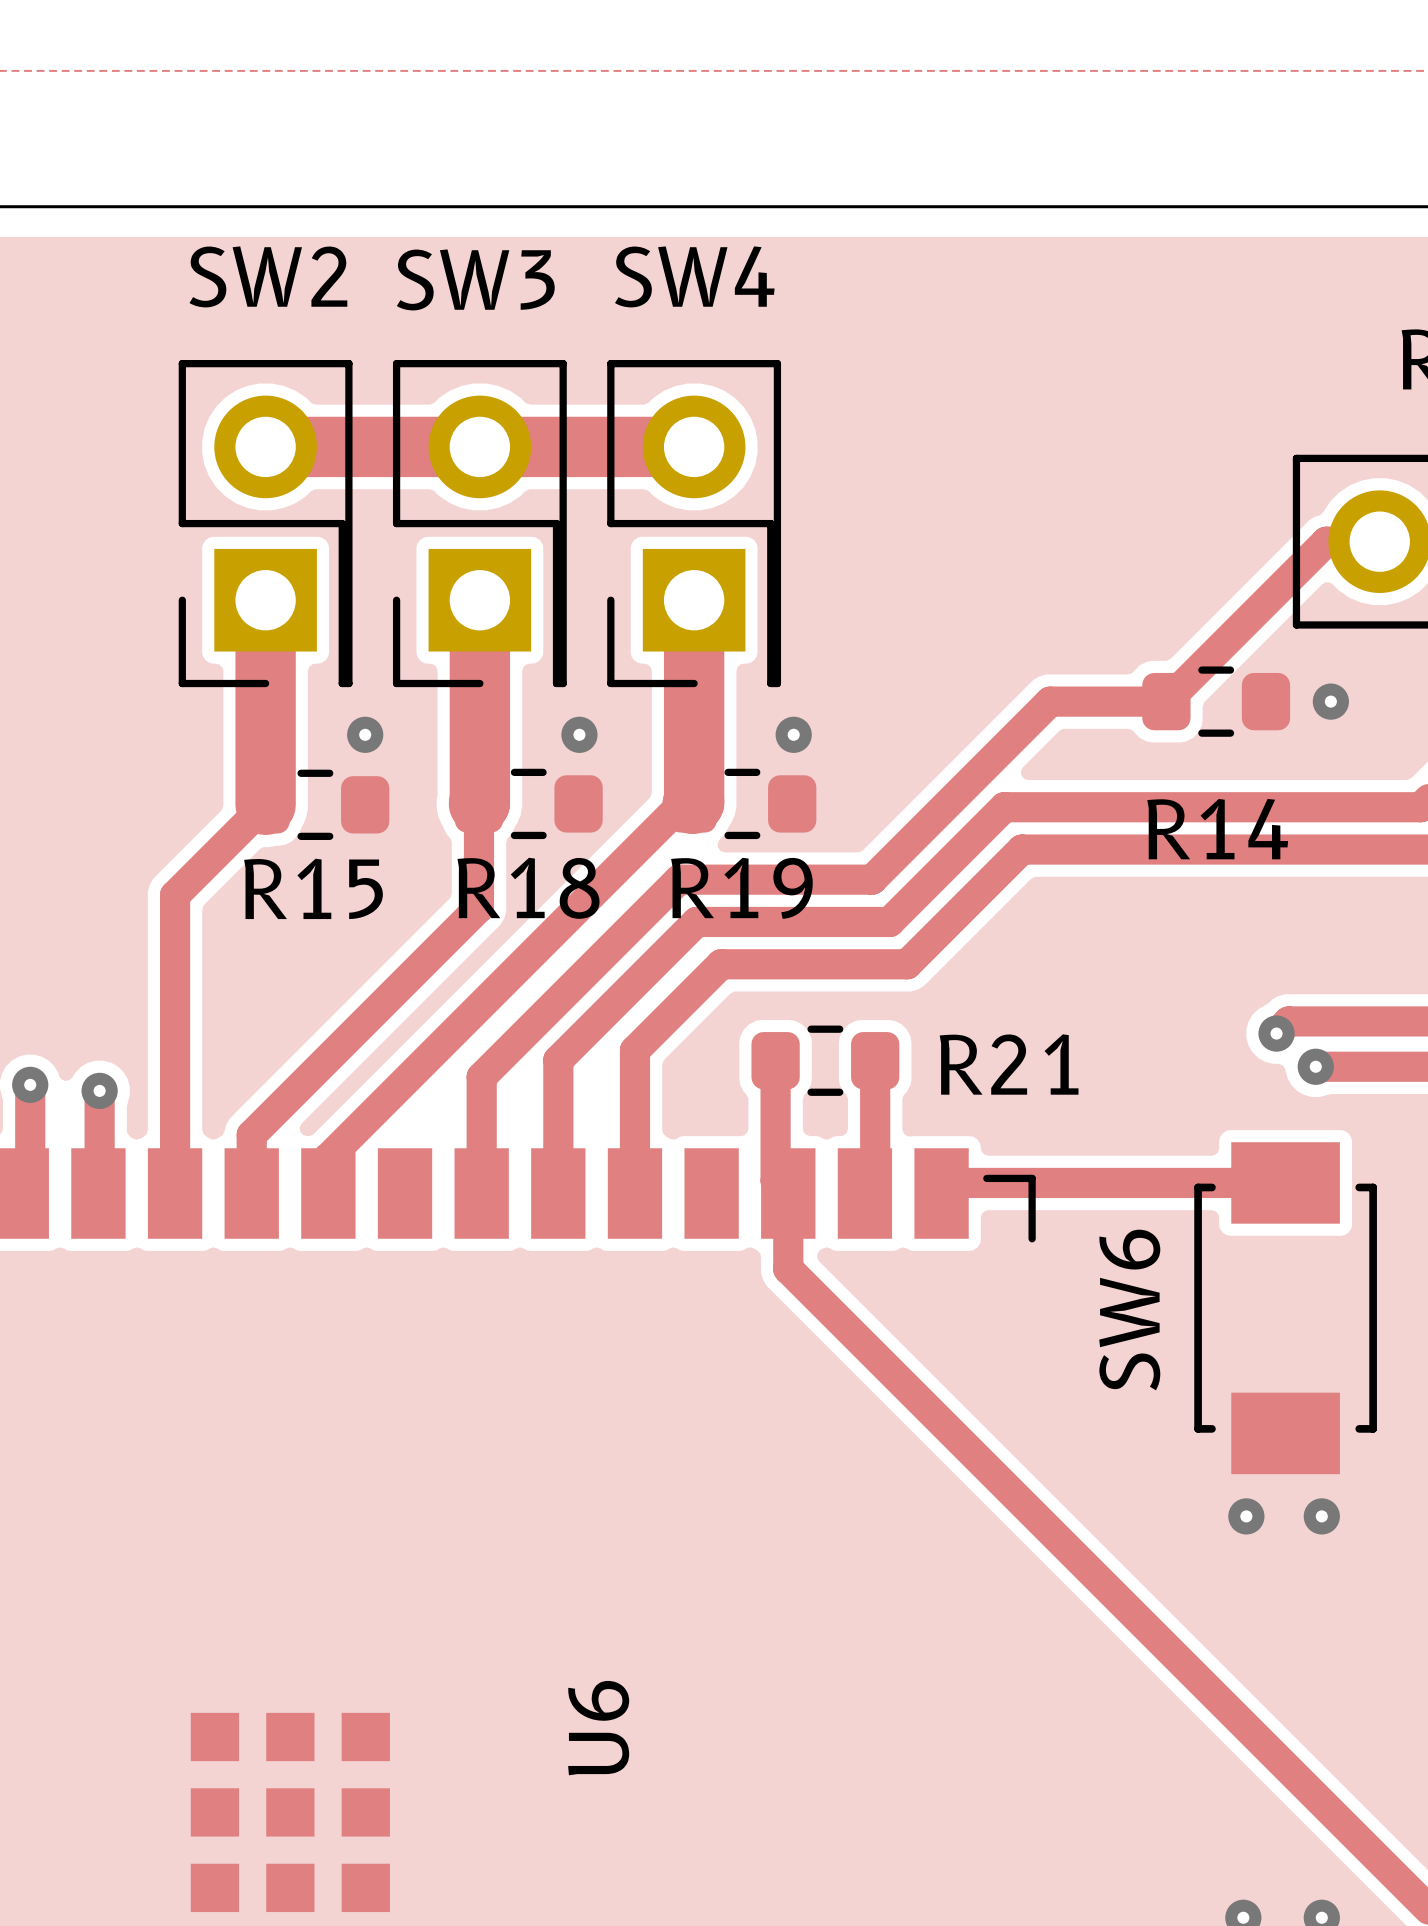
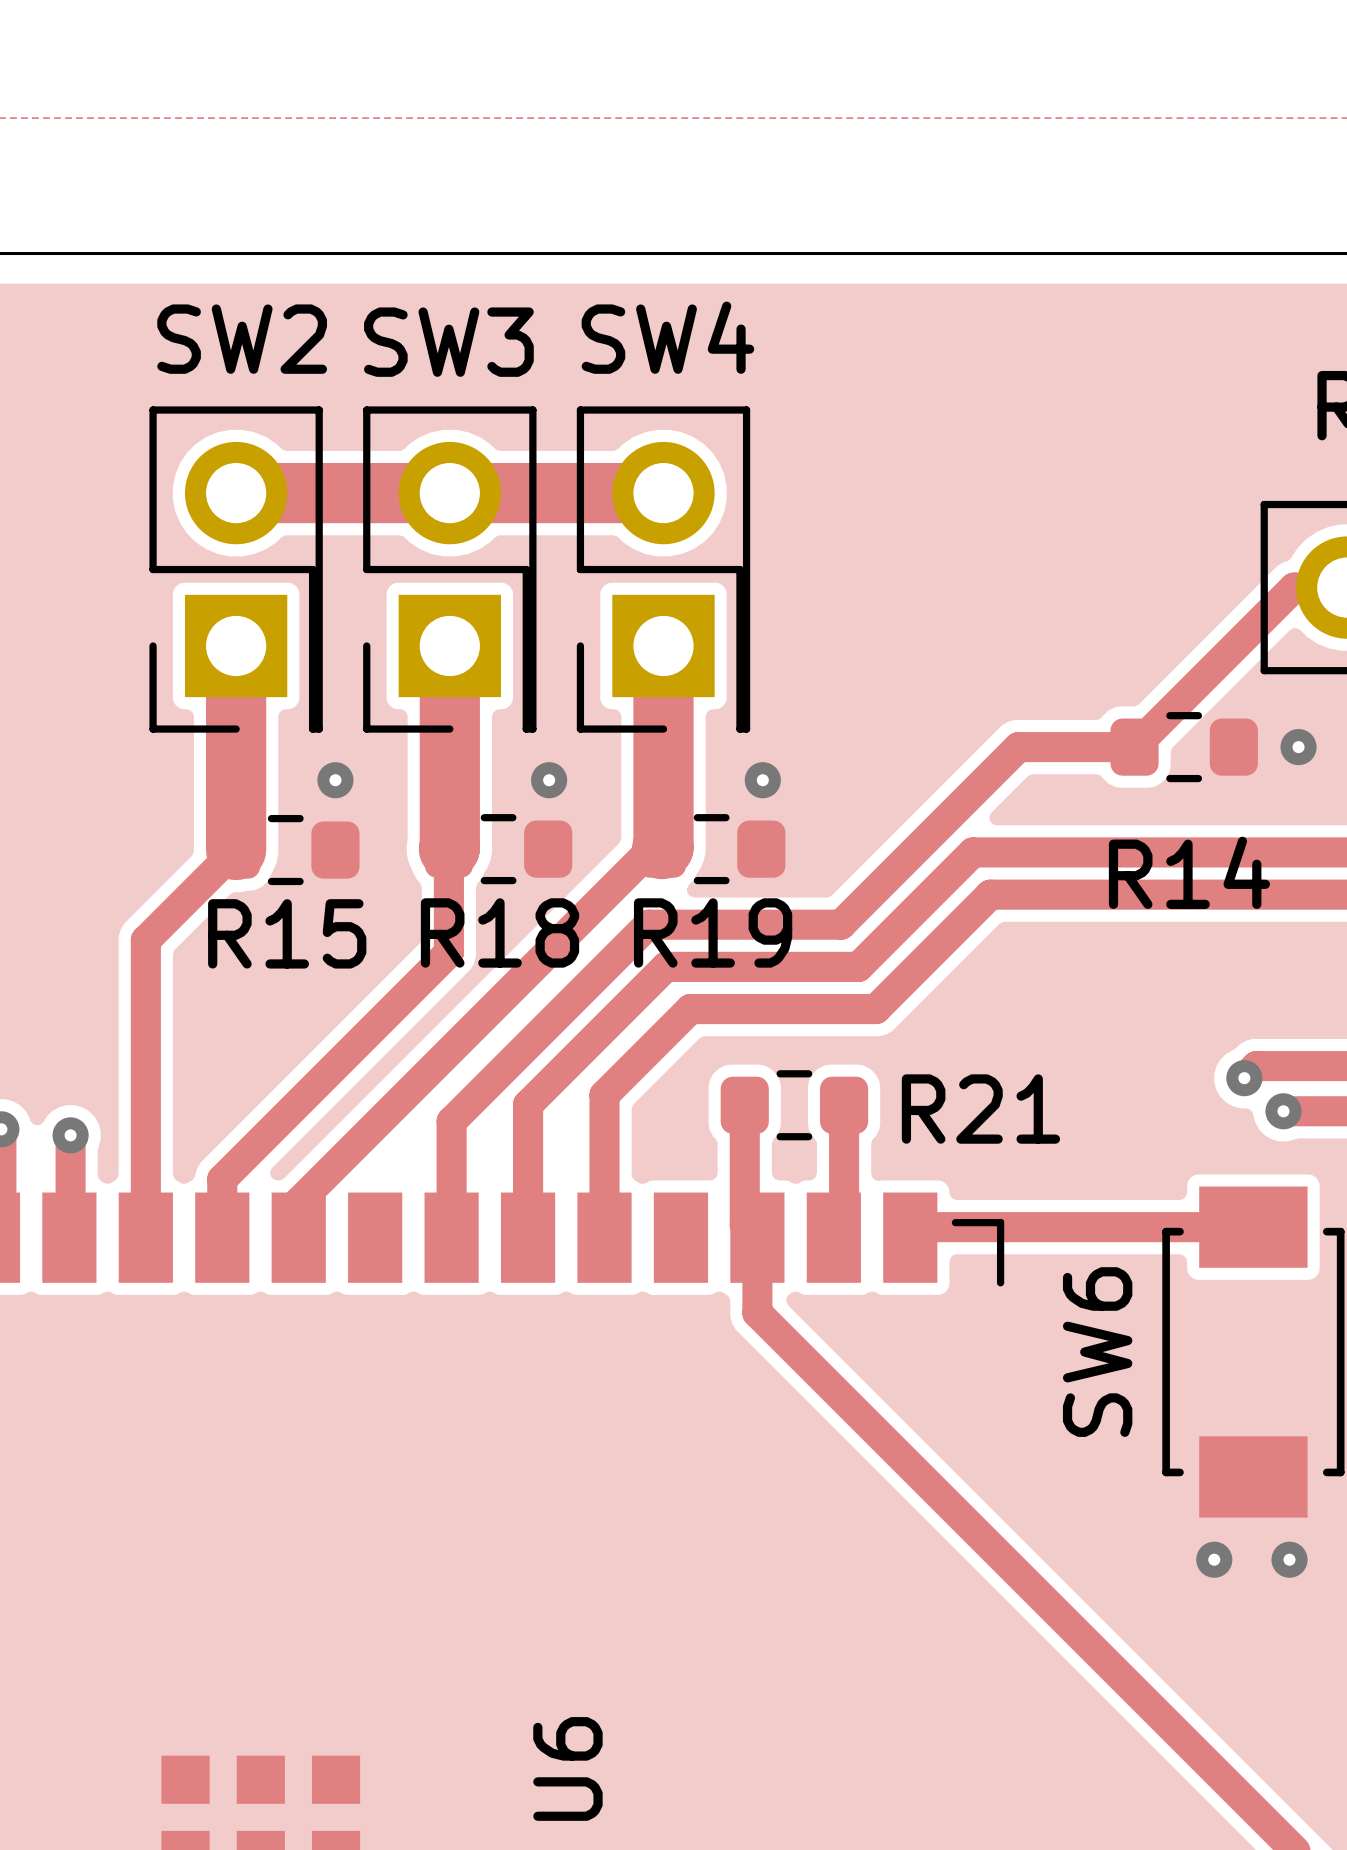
SW2 name position: SW2 (268, 276) -> SW2 (242, 339)
SW4 name position: SW4 (694, 276) -> SW4 (667, 337)
SW3 name position: SW3 (475, 279) -> SW3 (448, 342)

